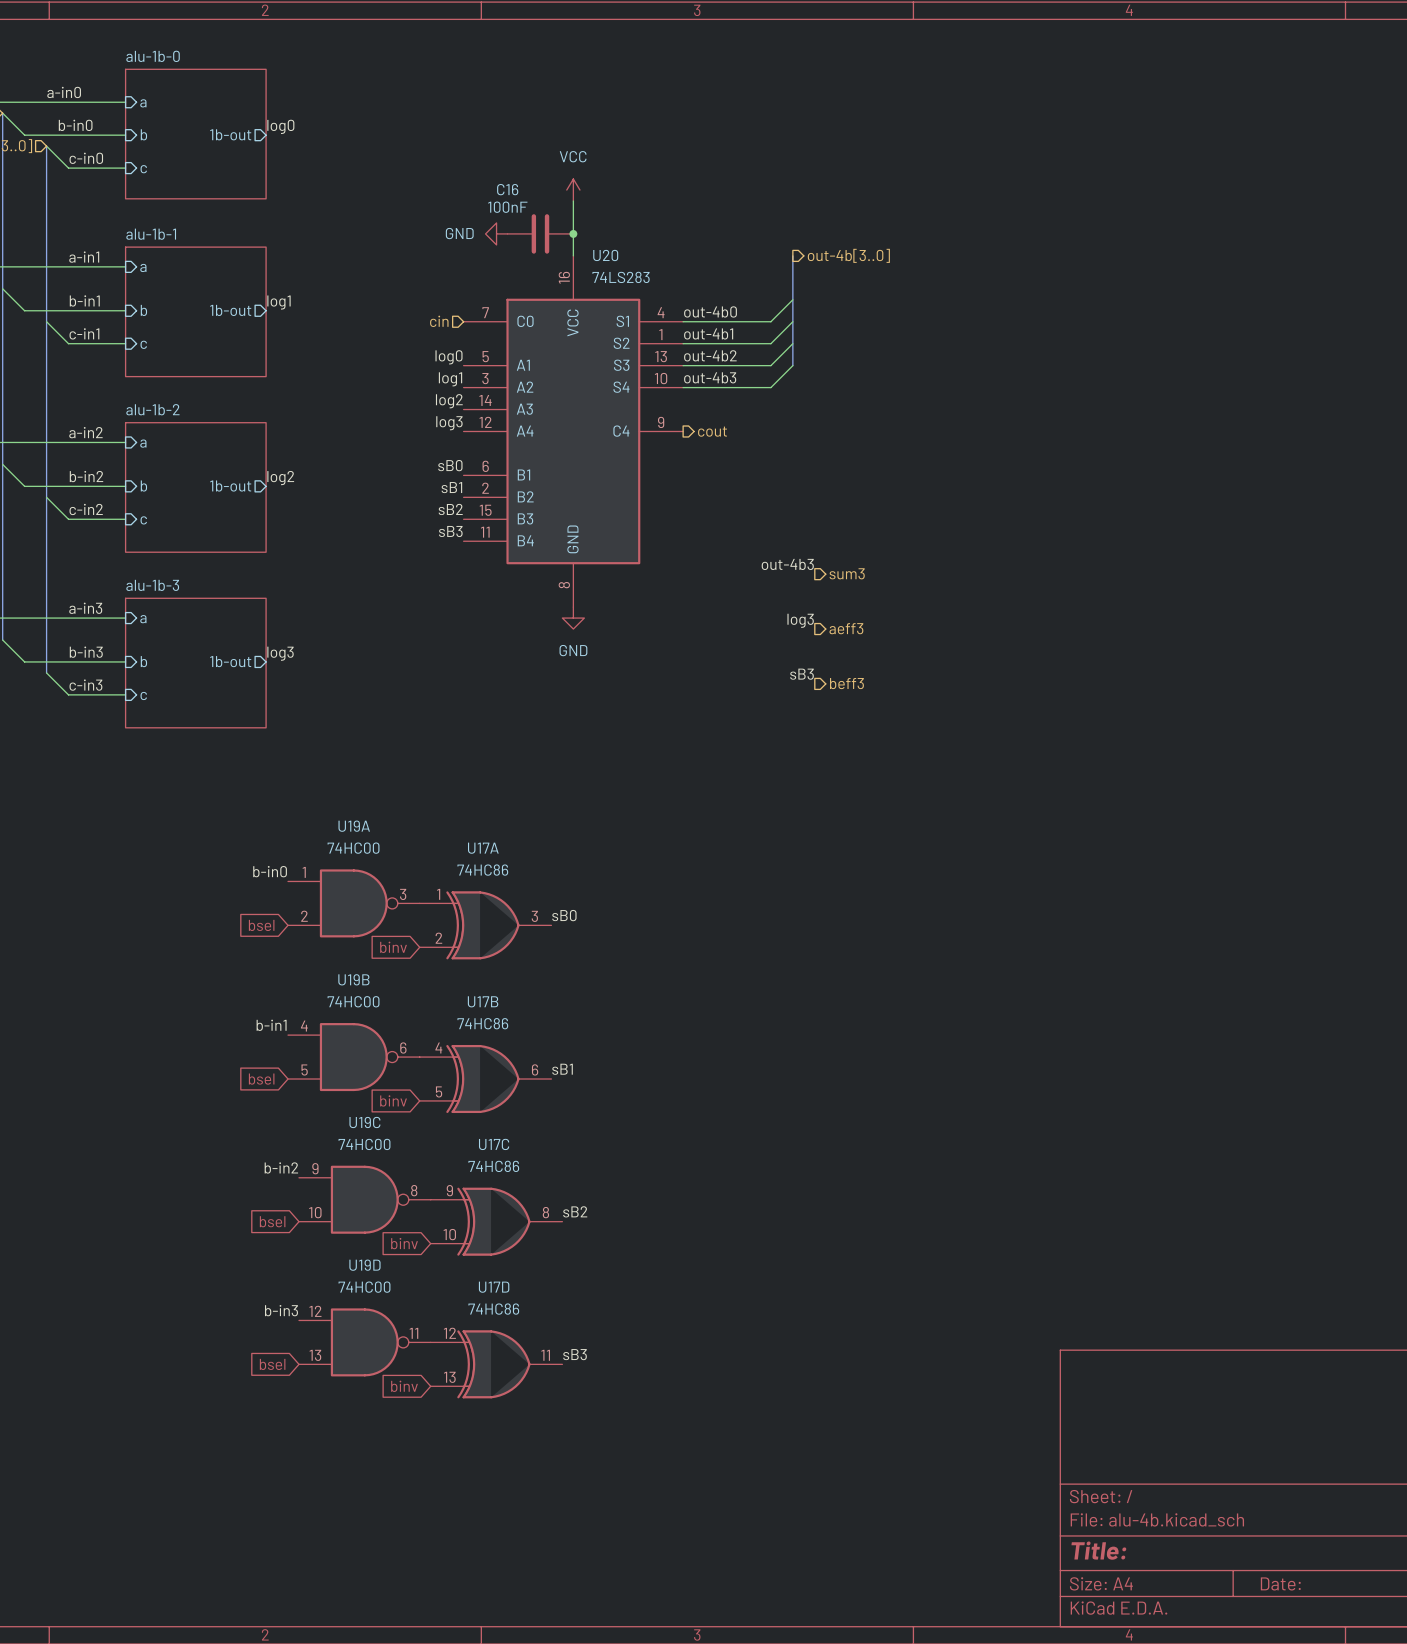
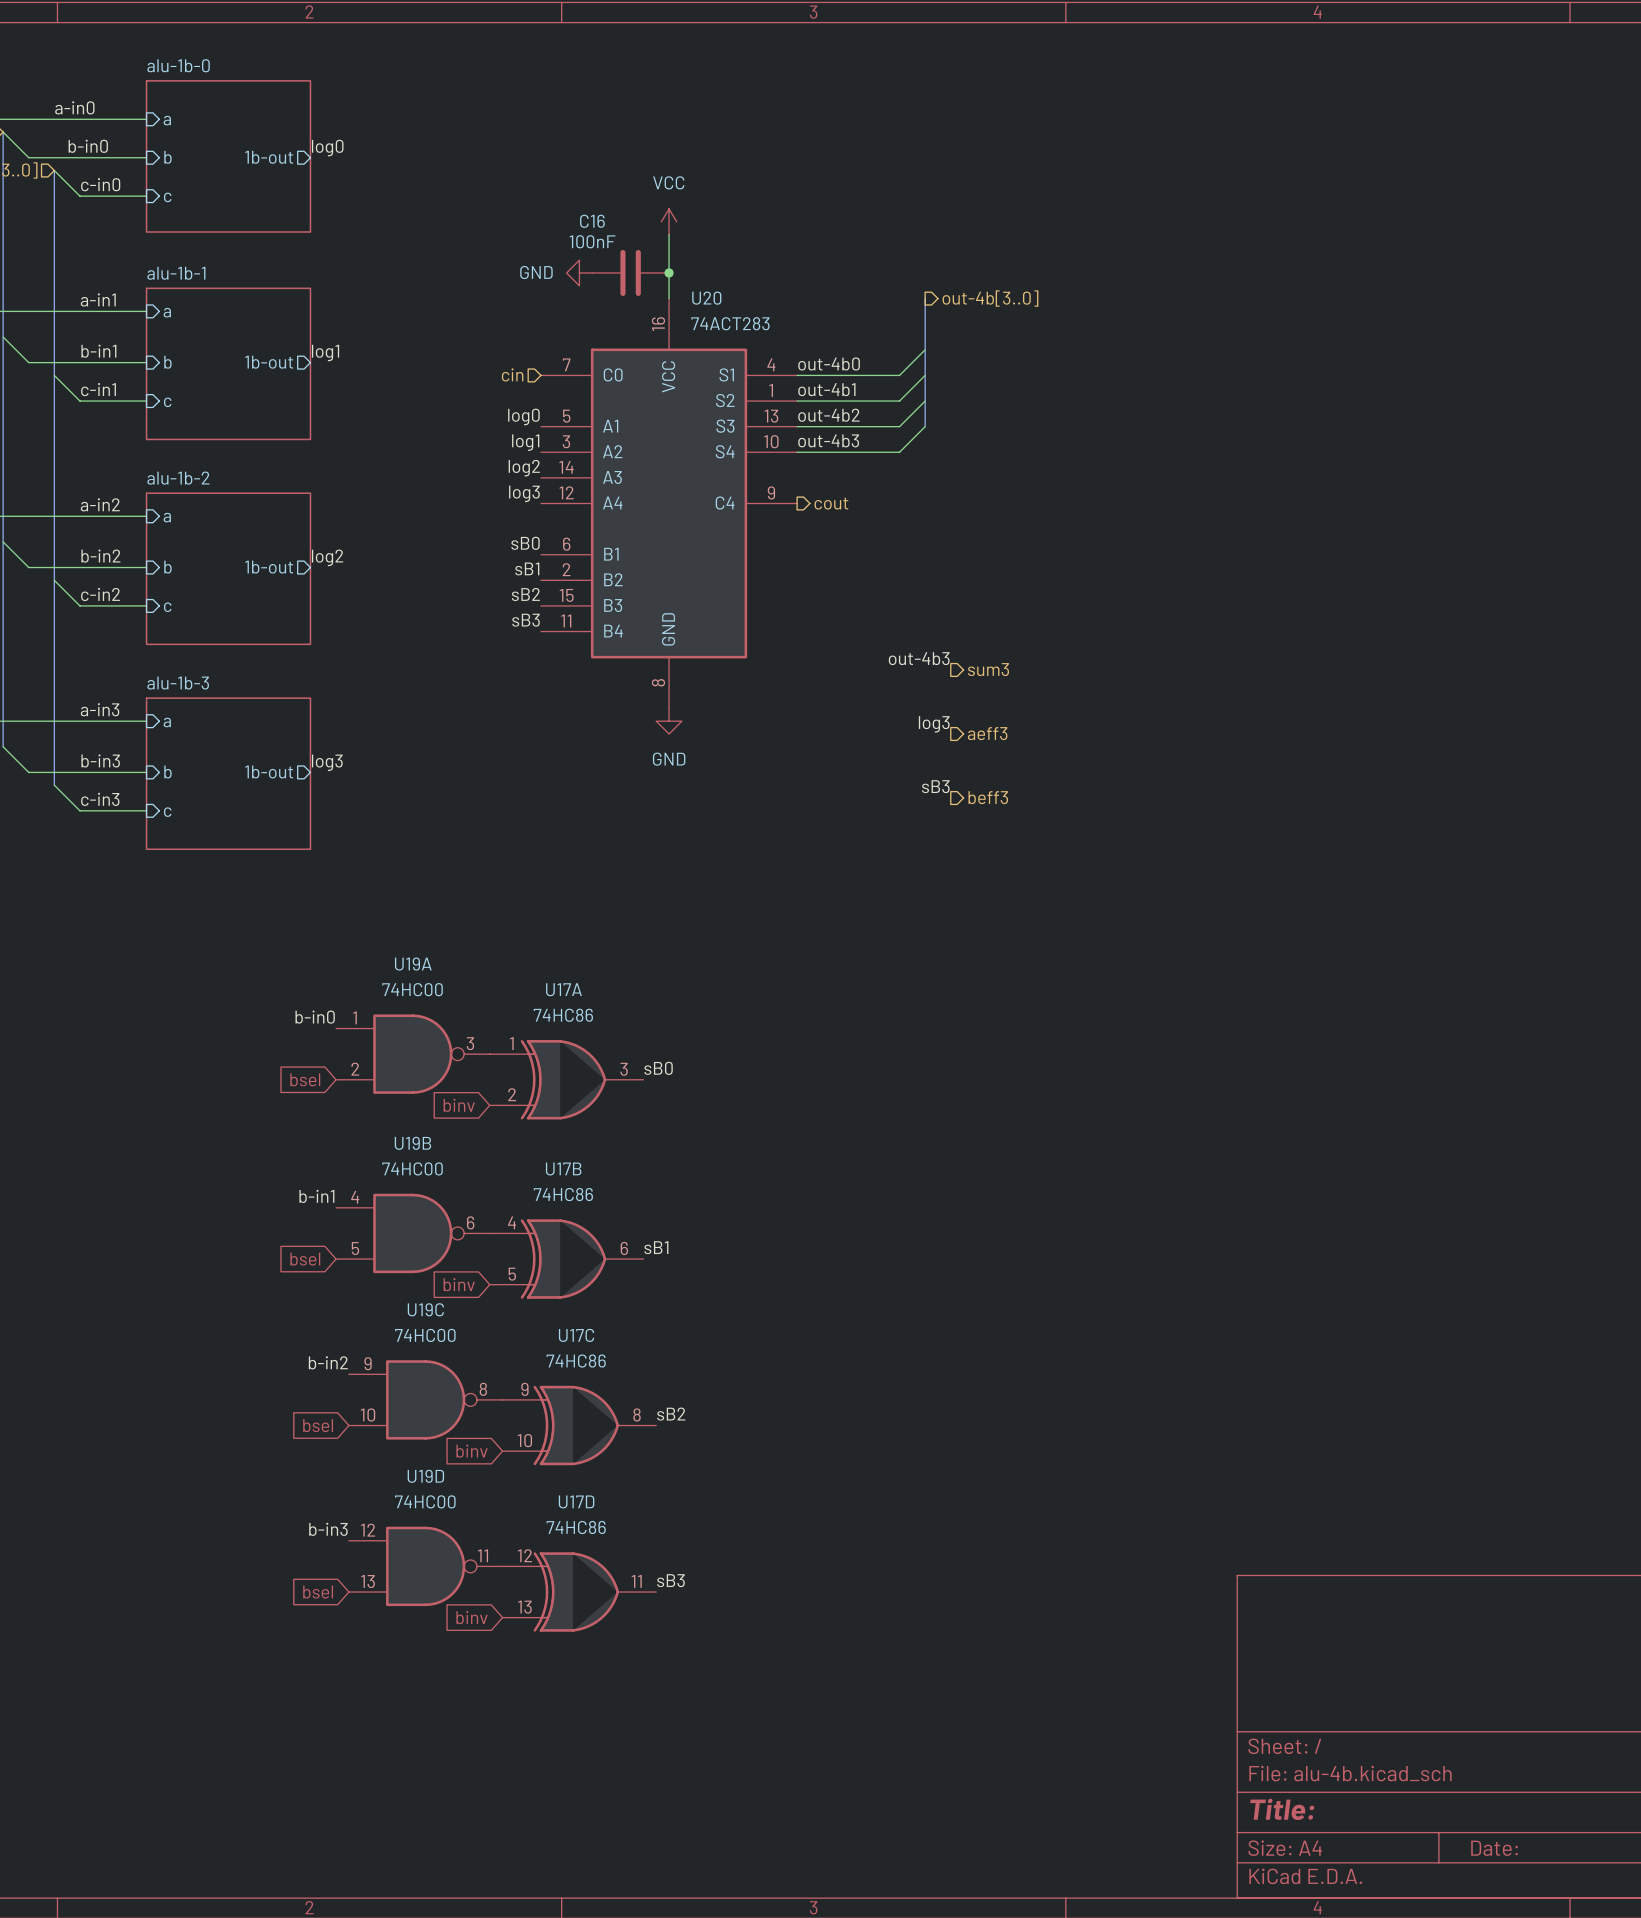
U20 value: 74LS283 (621, 277) -> 74ACT283 (730, 323)

